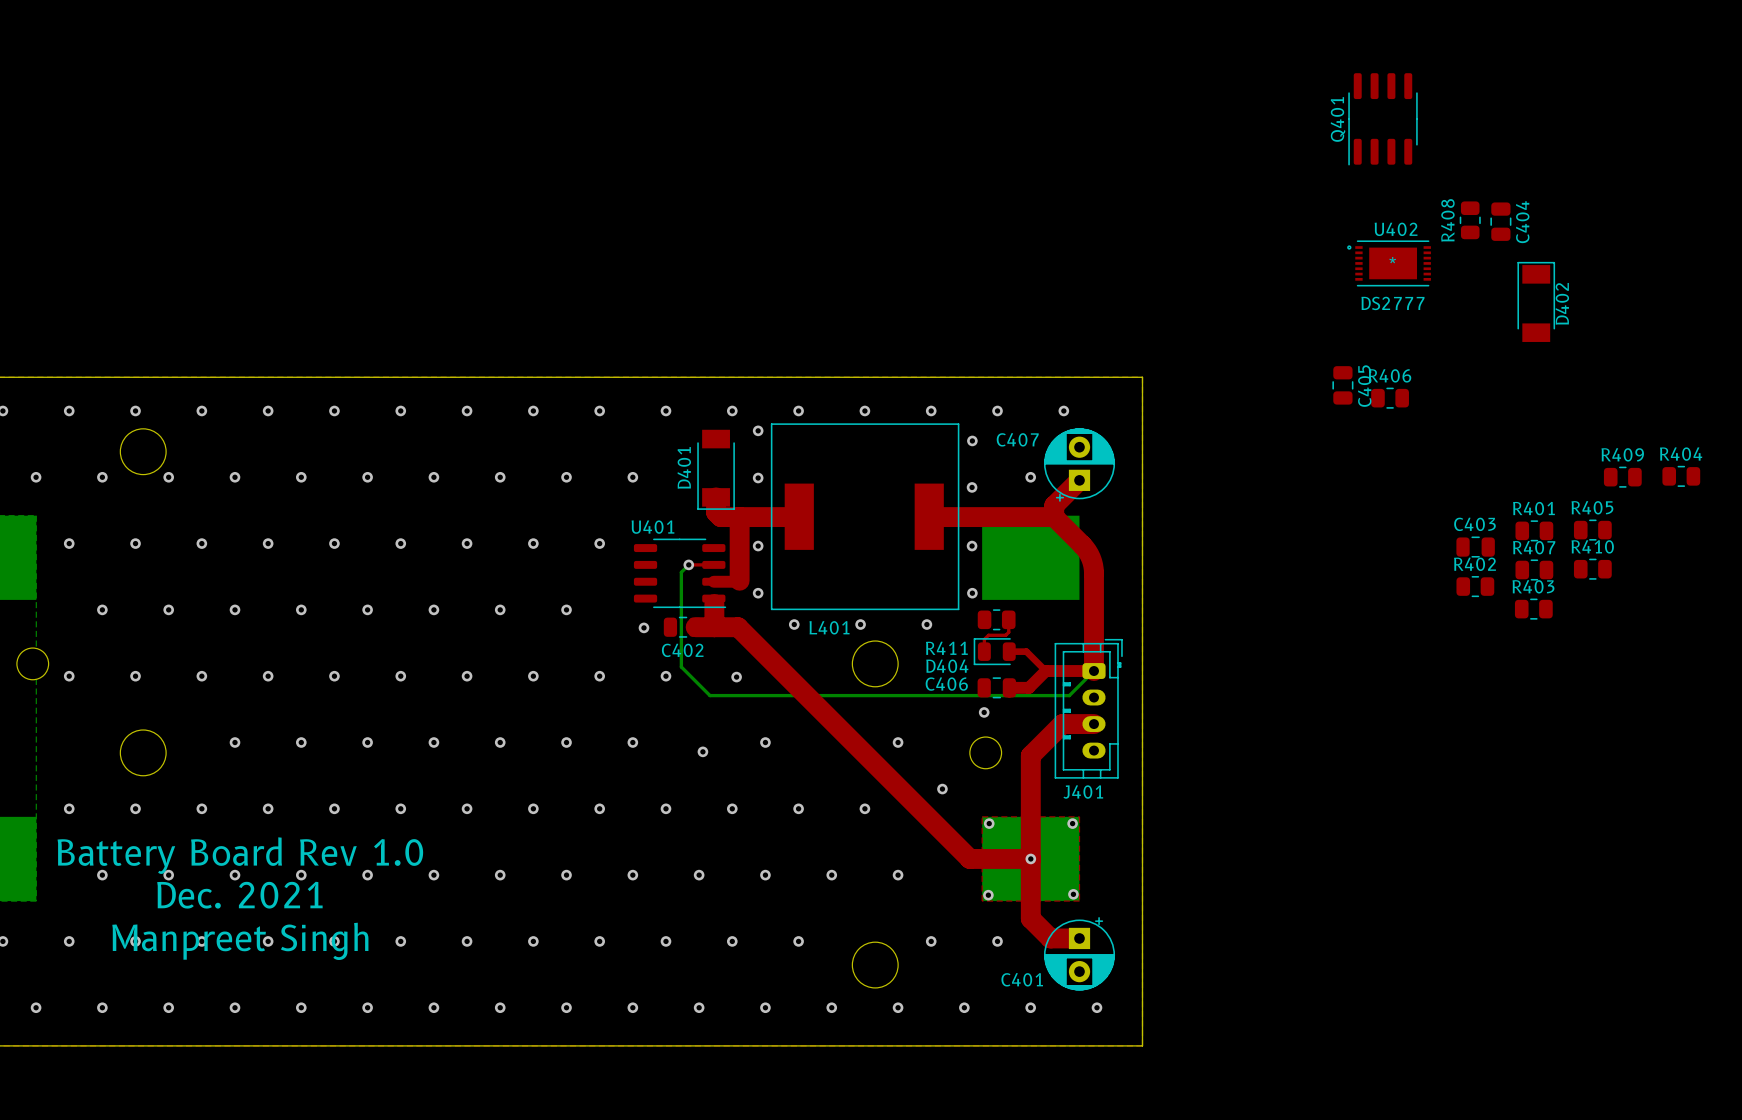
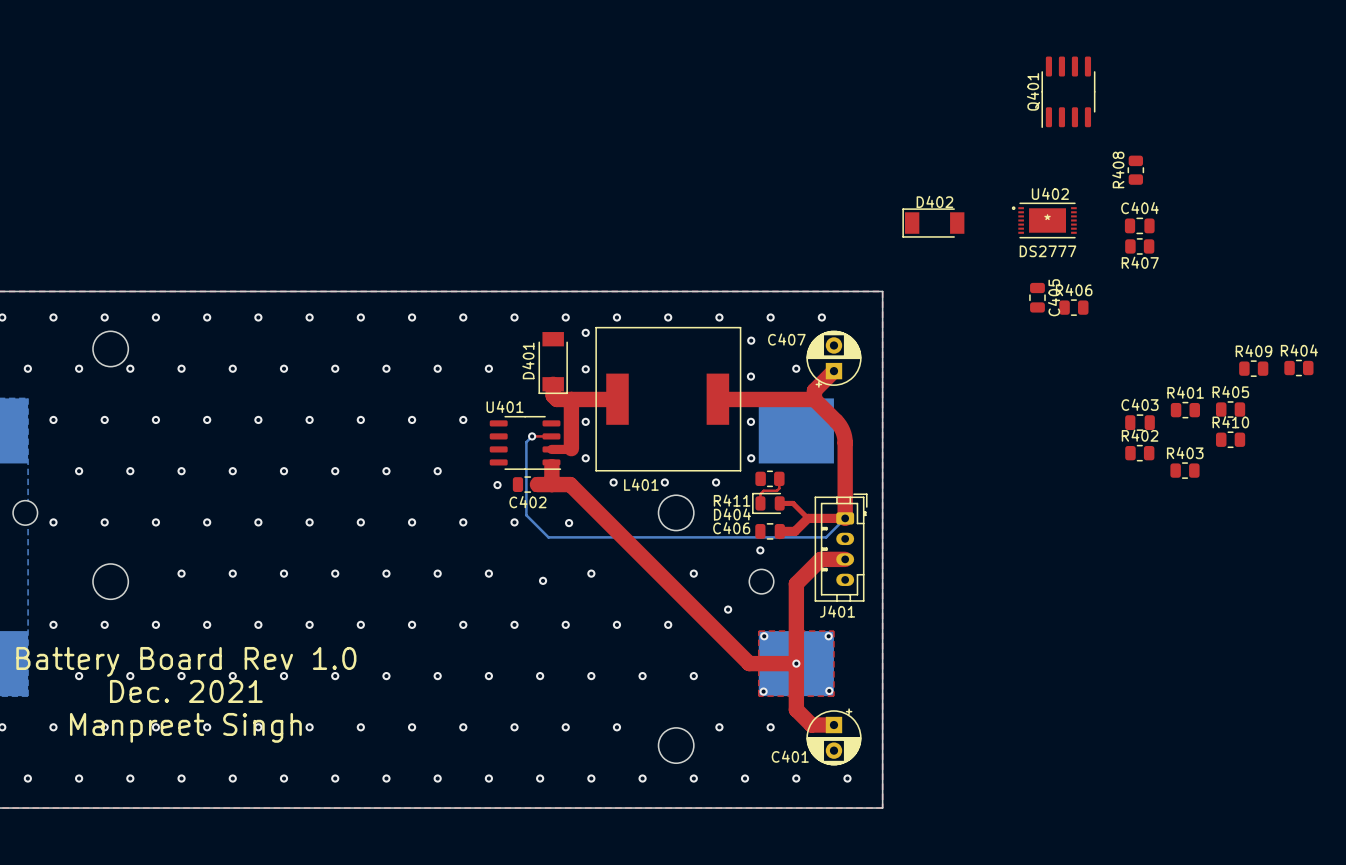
C404 rotation: 0° (1500, 221) -> 90° clockwise (1139, 225)
C404 position: (1500, 221) -> (1139, 225)
C404 name position: C404 (1522, 222) -> C404 (1139, 208)
U402 position: (1389, 263) -> (1044, 220)
D402 rotation: 0° (1536, 301) -> 90° counterclockwise (933, 223)
D402 position: (1536, 301) -> (933, 223)
R407 name position: R407 (1534, 547) -> R407 (1140, 262)
R407 position: (1534, 569) -> (1139, 246)

